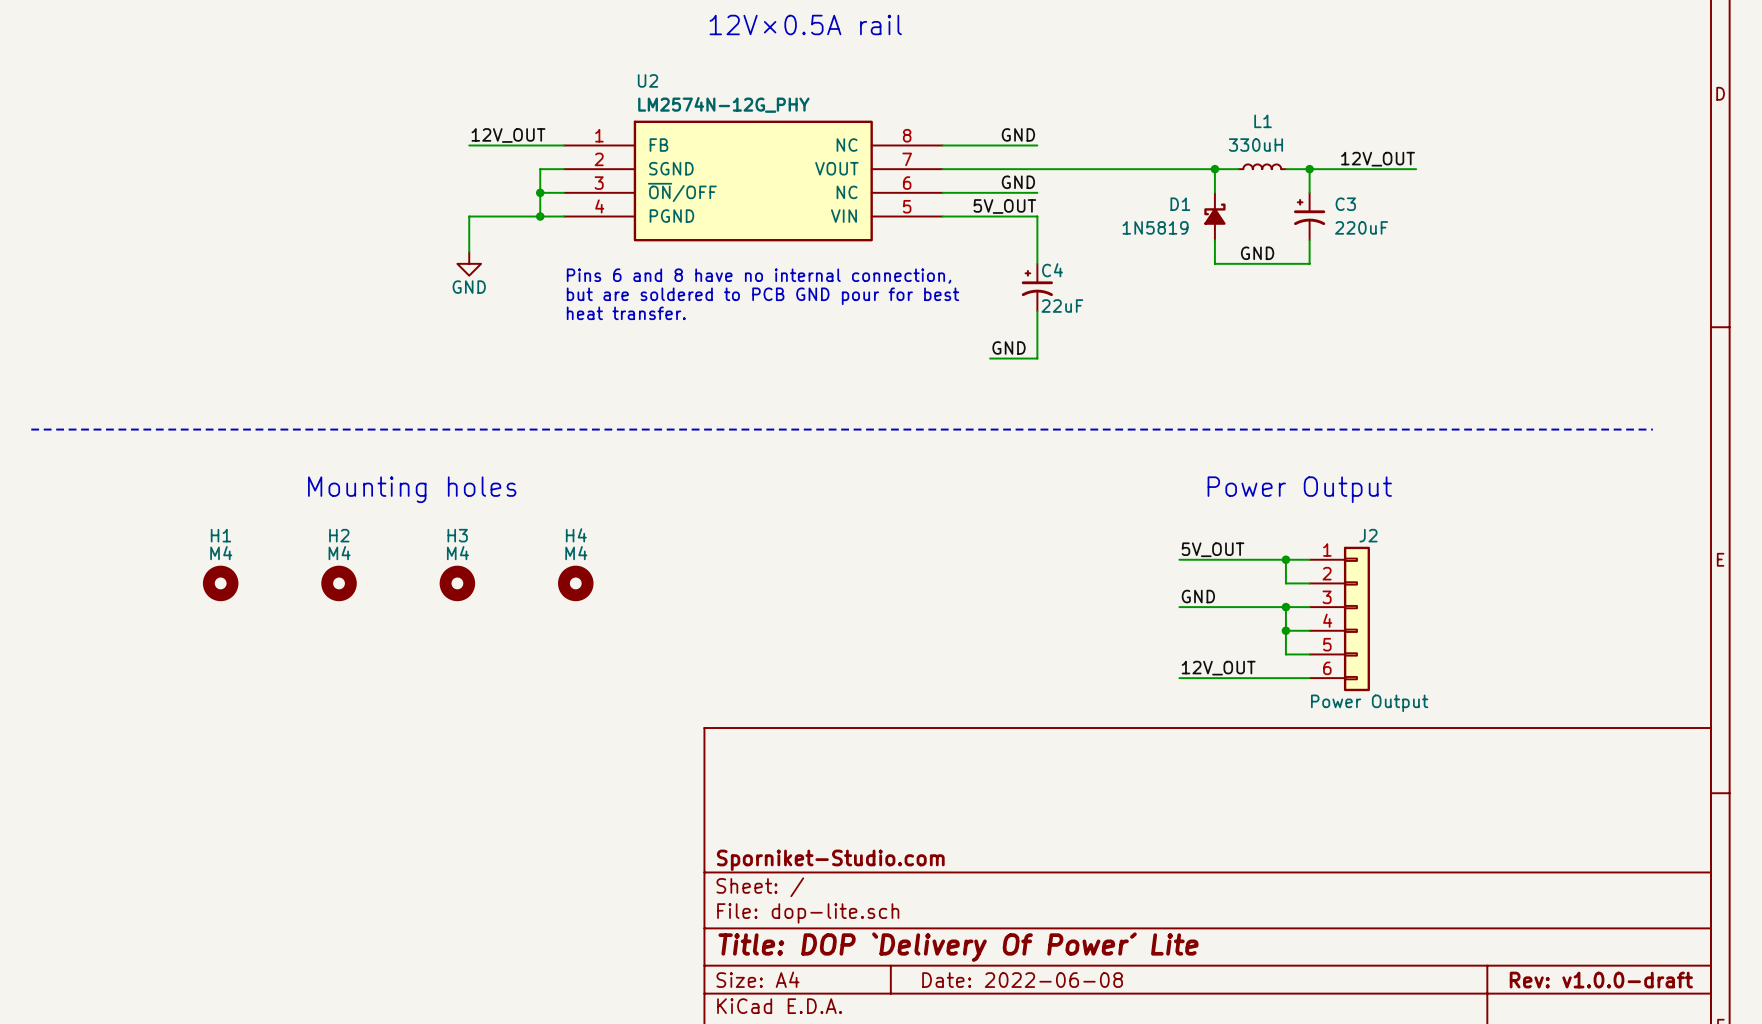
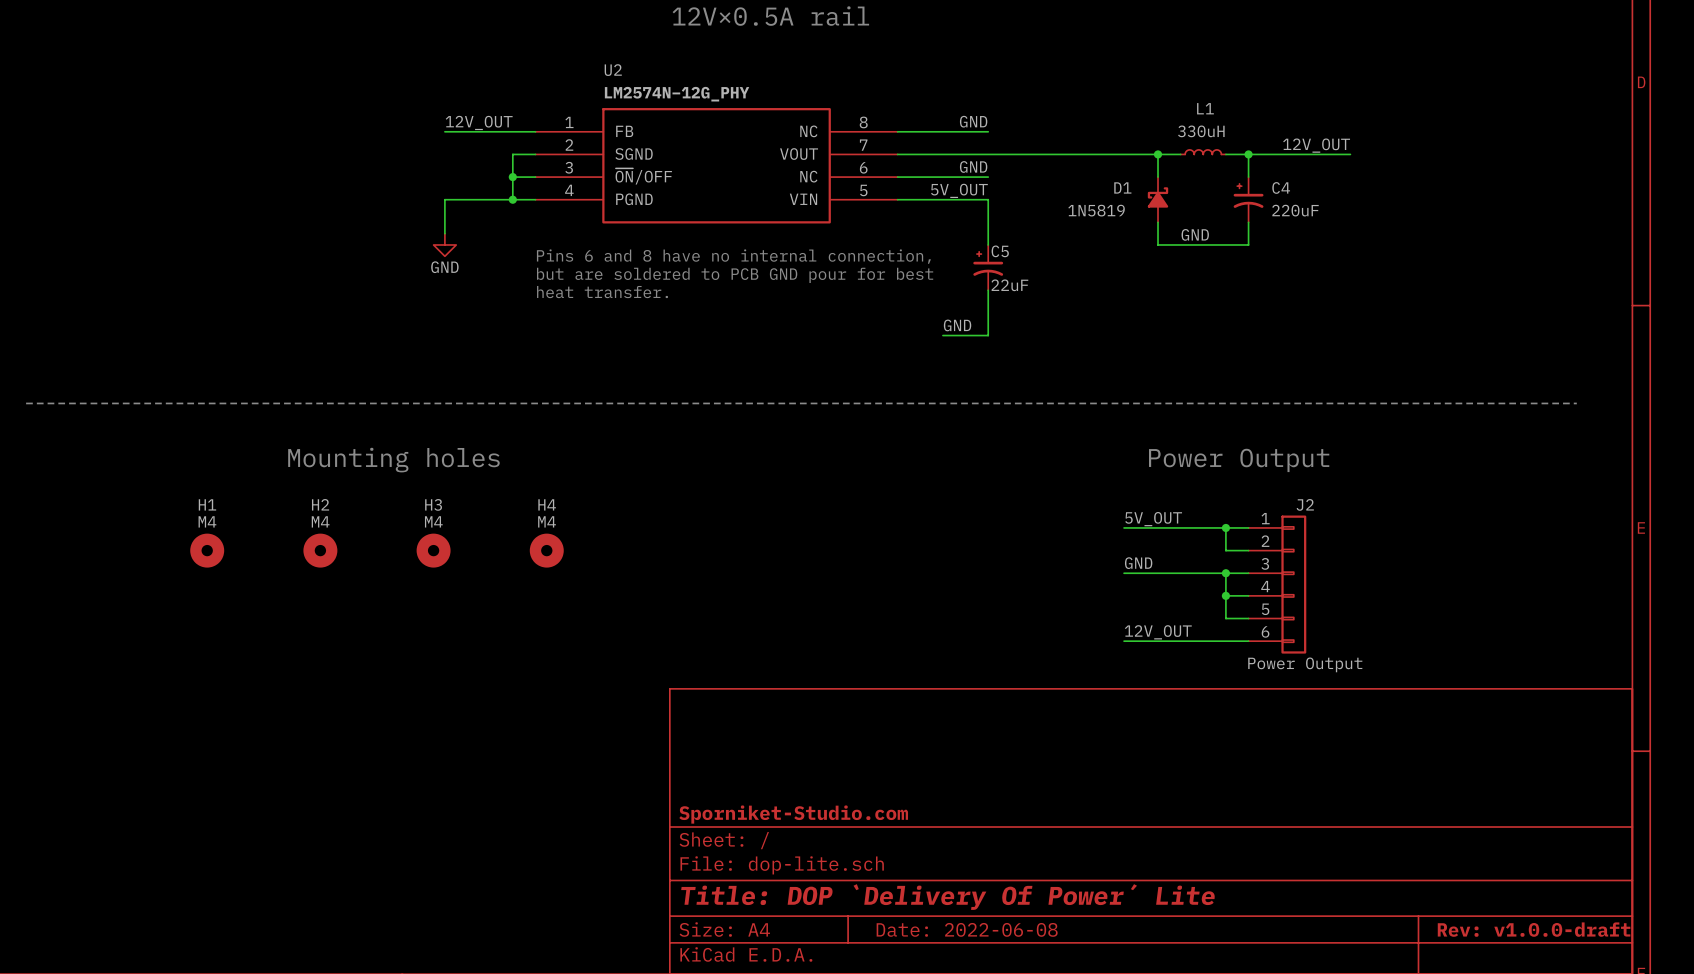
C3 name: C3 (1345, 204) -> C4 (1281, 187)
C4 name: C4 (1052, 270) -> C5 (1000, 251)

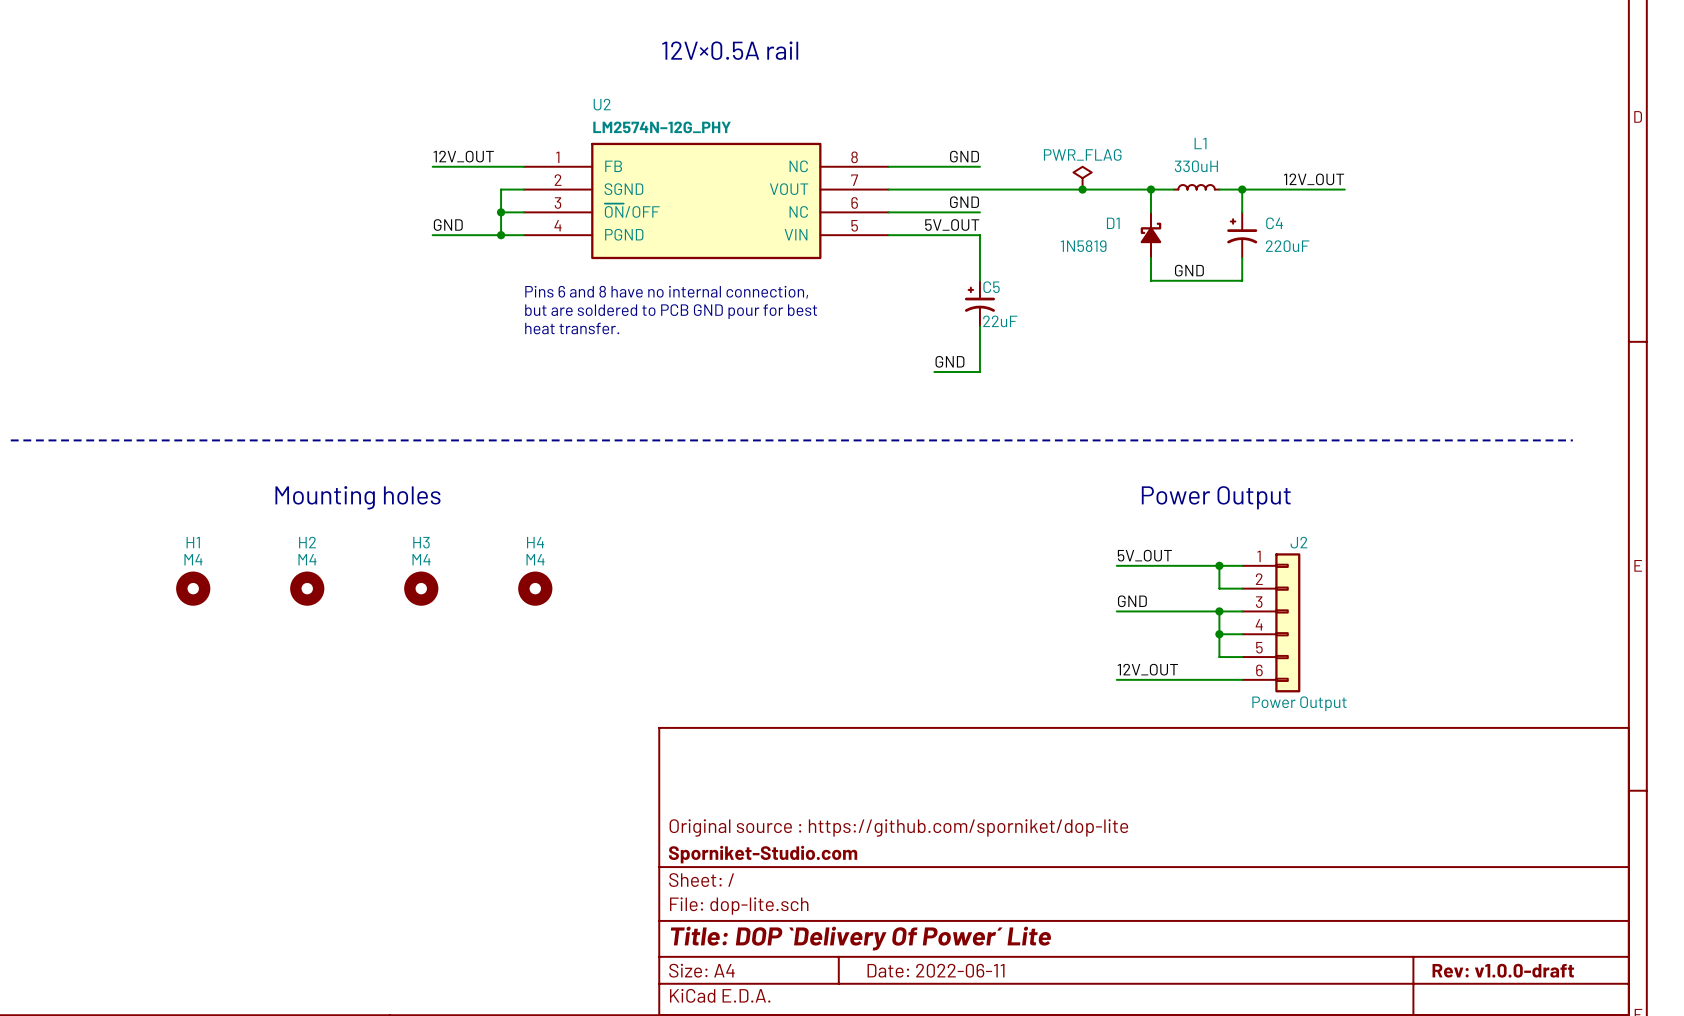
power symbol: none -> PWR_FLAG (1082, 178)
junction: none -> (1082, 189)
label: none -> GND (448, 225)
wire: (444, 199) (444, 233) -> none
power symbol: GND (444, 244) -> none
title block: none -> Original source : https://github.com/sporniket/dop-lite (898, 827)
title block: Date: 2022-06-08 (967, 929) -> Date: 2022-06-11 (936, 970)

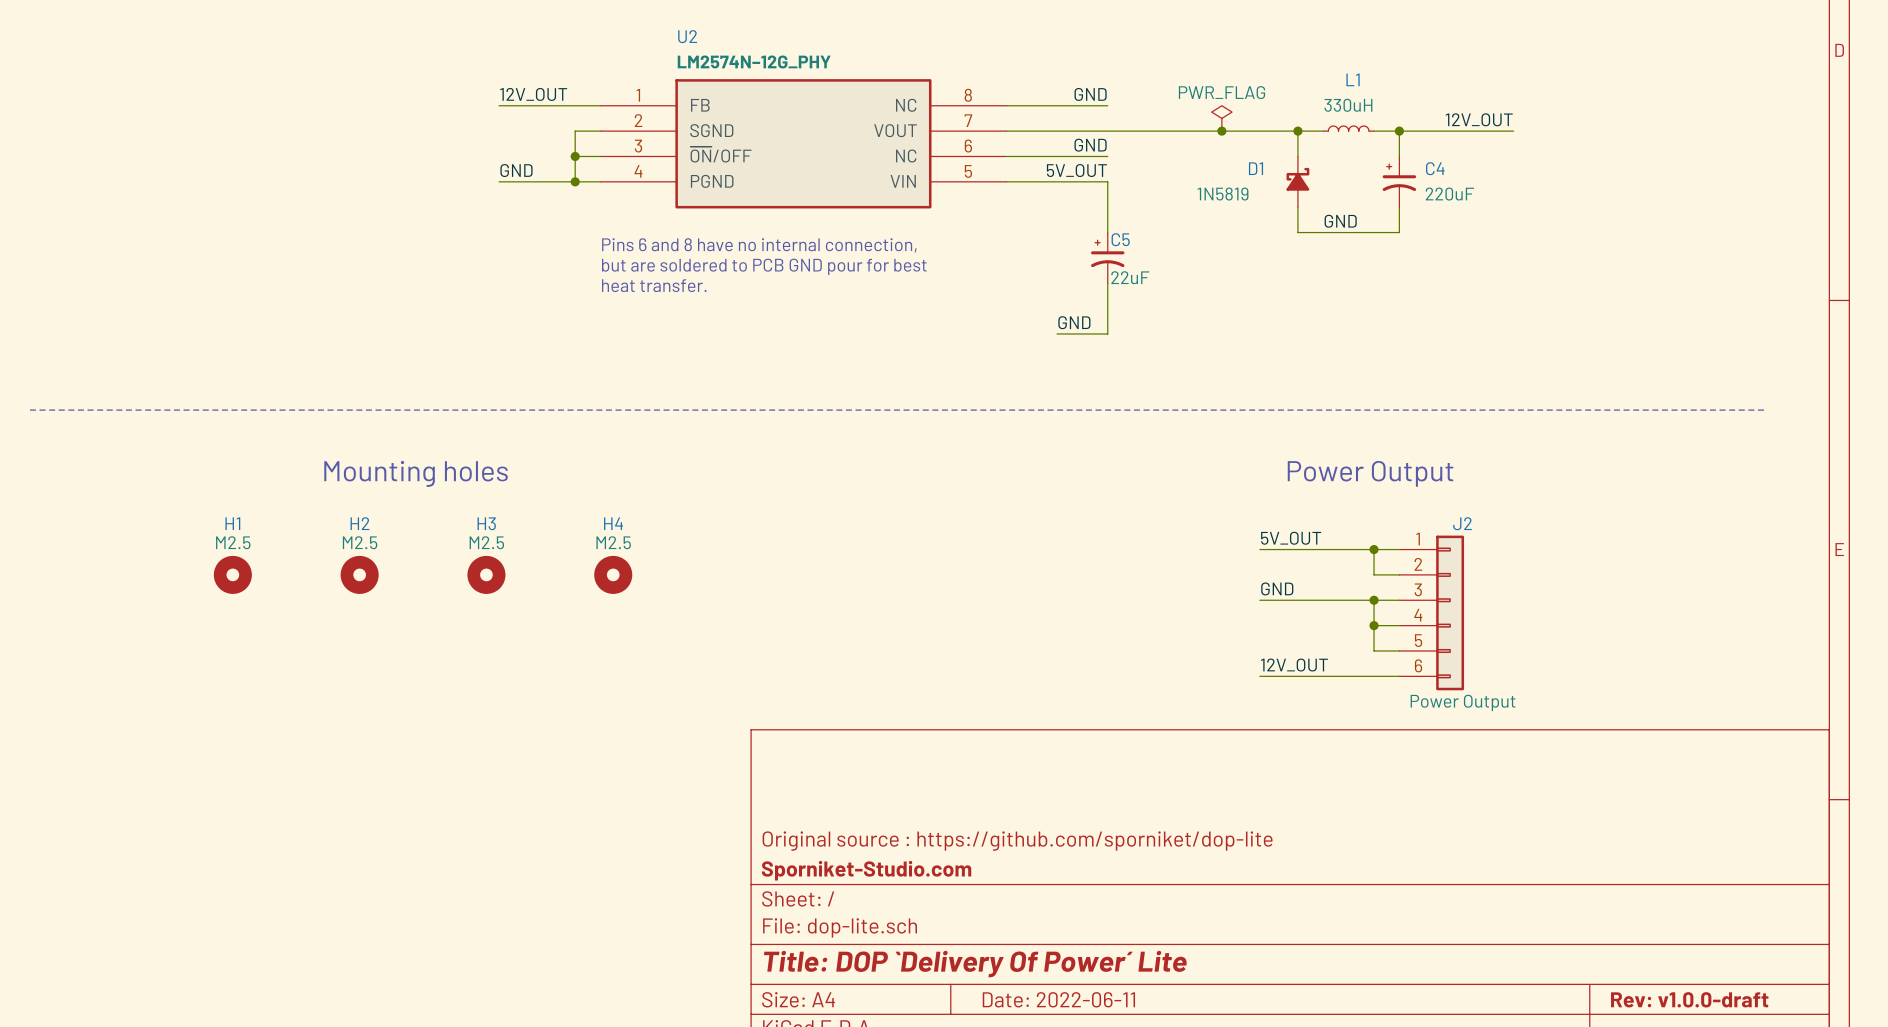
H1 value: M4 (193, 559) -> M2.5 (233, 542)
H2 value: M4 (307, 559) -> M2.5 (360, 542)
H3 value: M4 (421, 559) -> M2.5 (486, 542)
H4 value: M4 (535, 559) -> M2.5 (613, 542)

